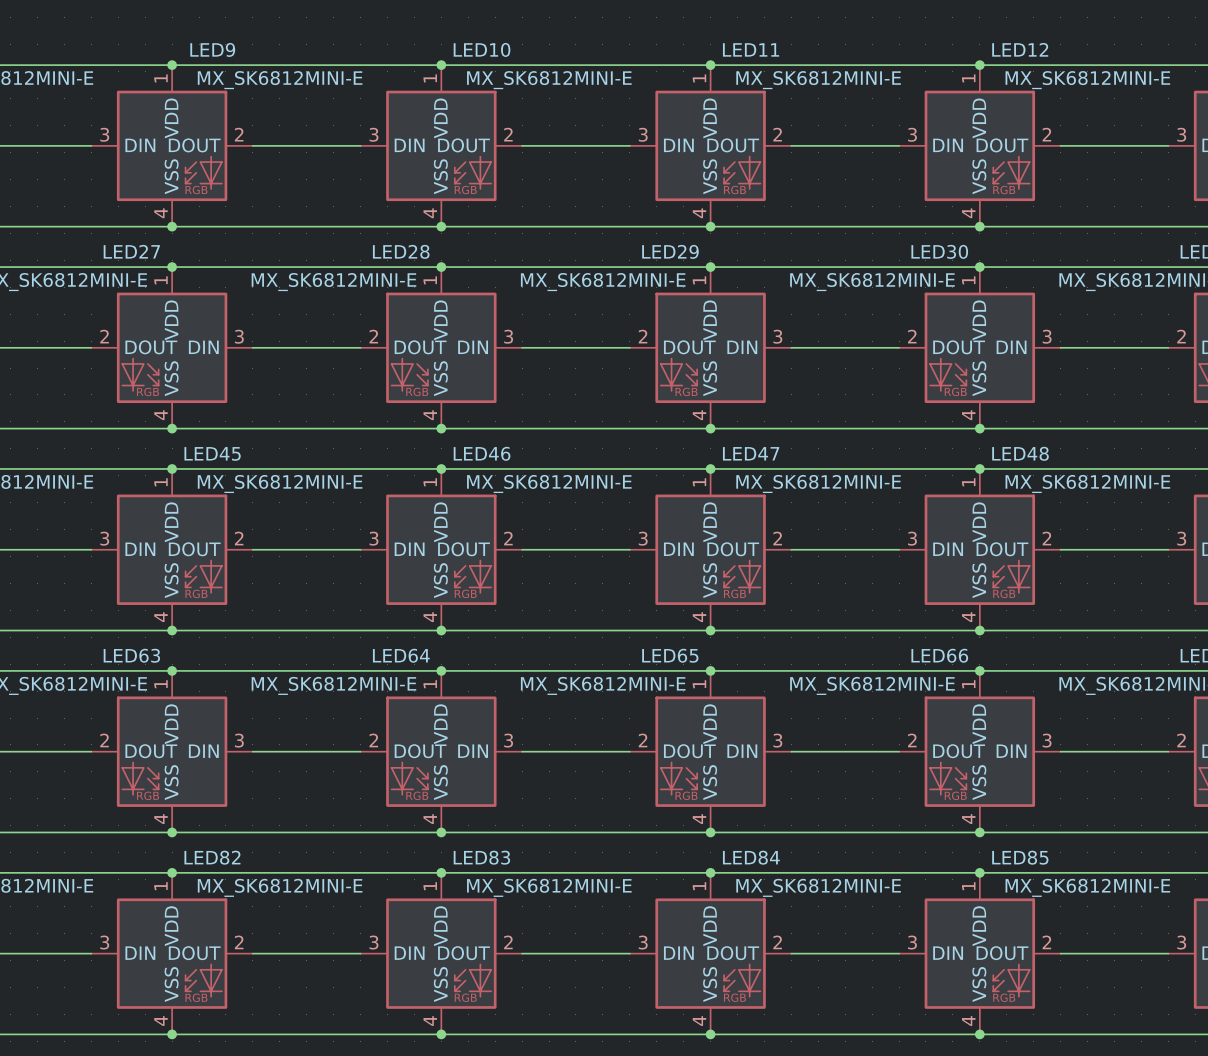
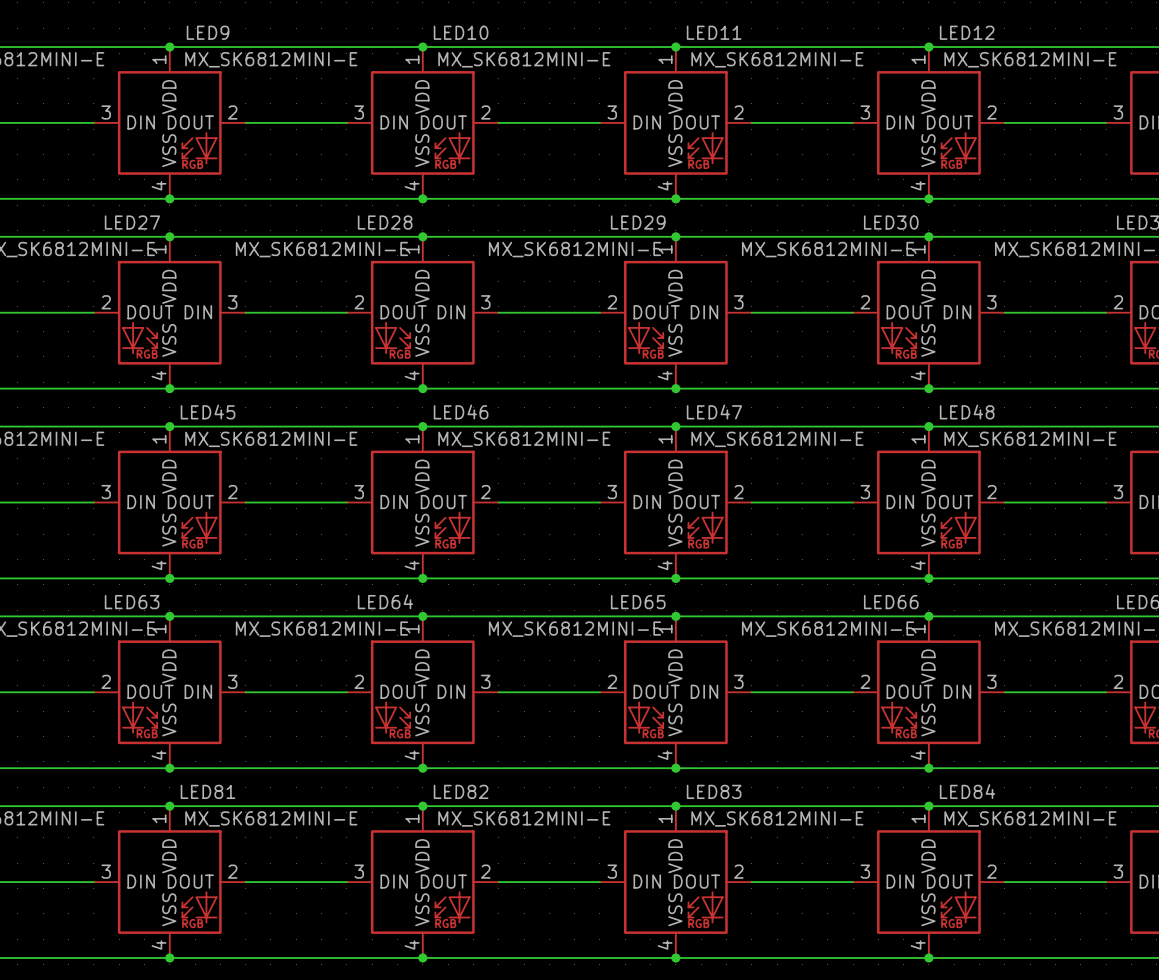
LED82 name: LED82 (212, 857) -> LED81 (208, 791)
LED83 name: LED83 (481, 857) -> LED82 (461, 791)
LED84 name: LED84 (751, 857) -> LED83 (714, 791)
LED85 name: LED85 (1020, 857) -> LED84 (967, 791)

